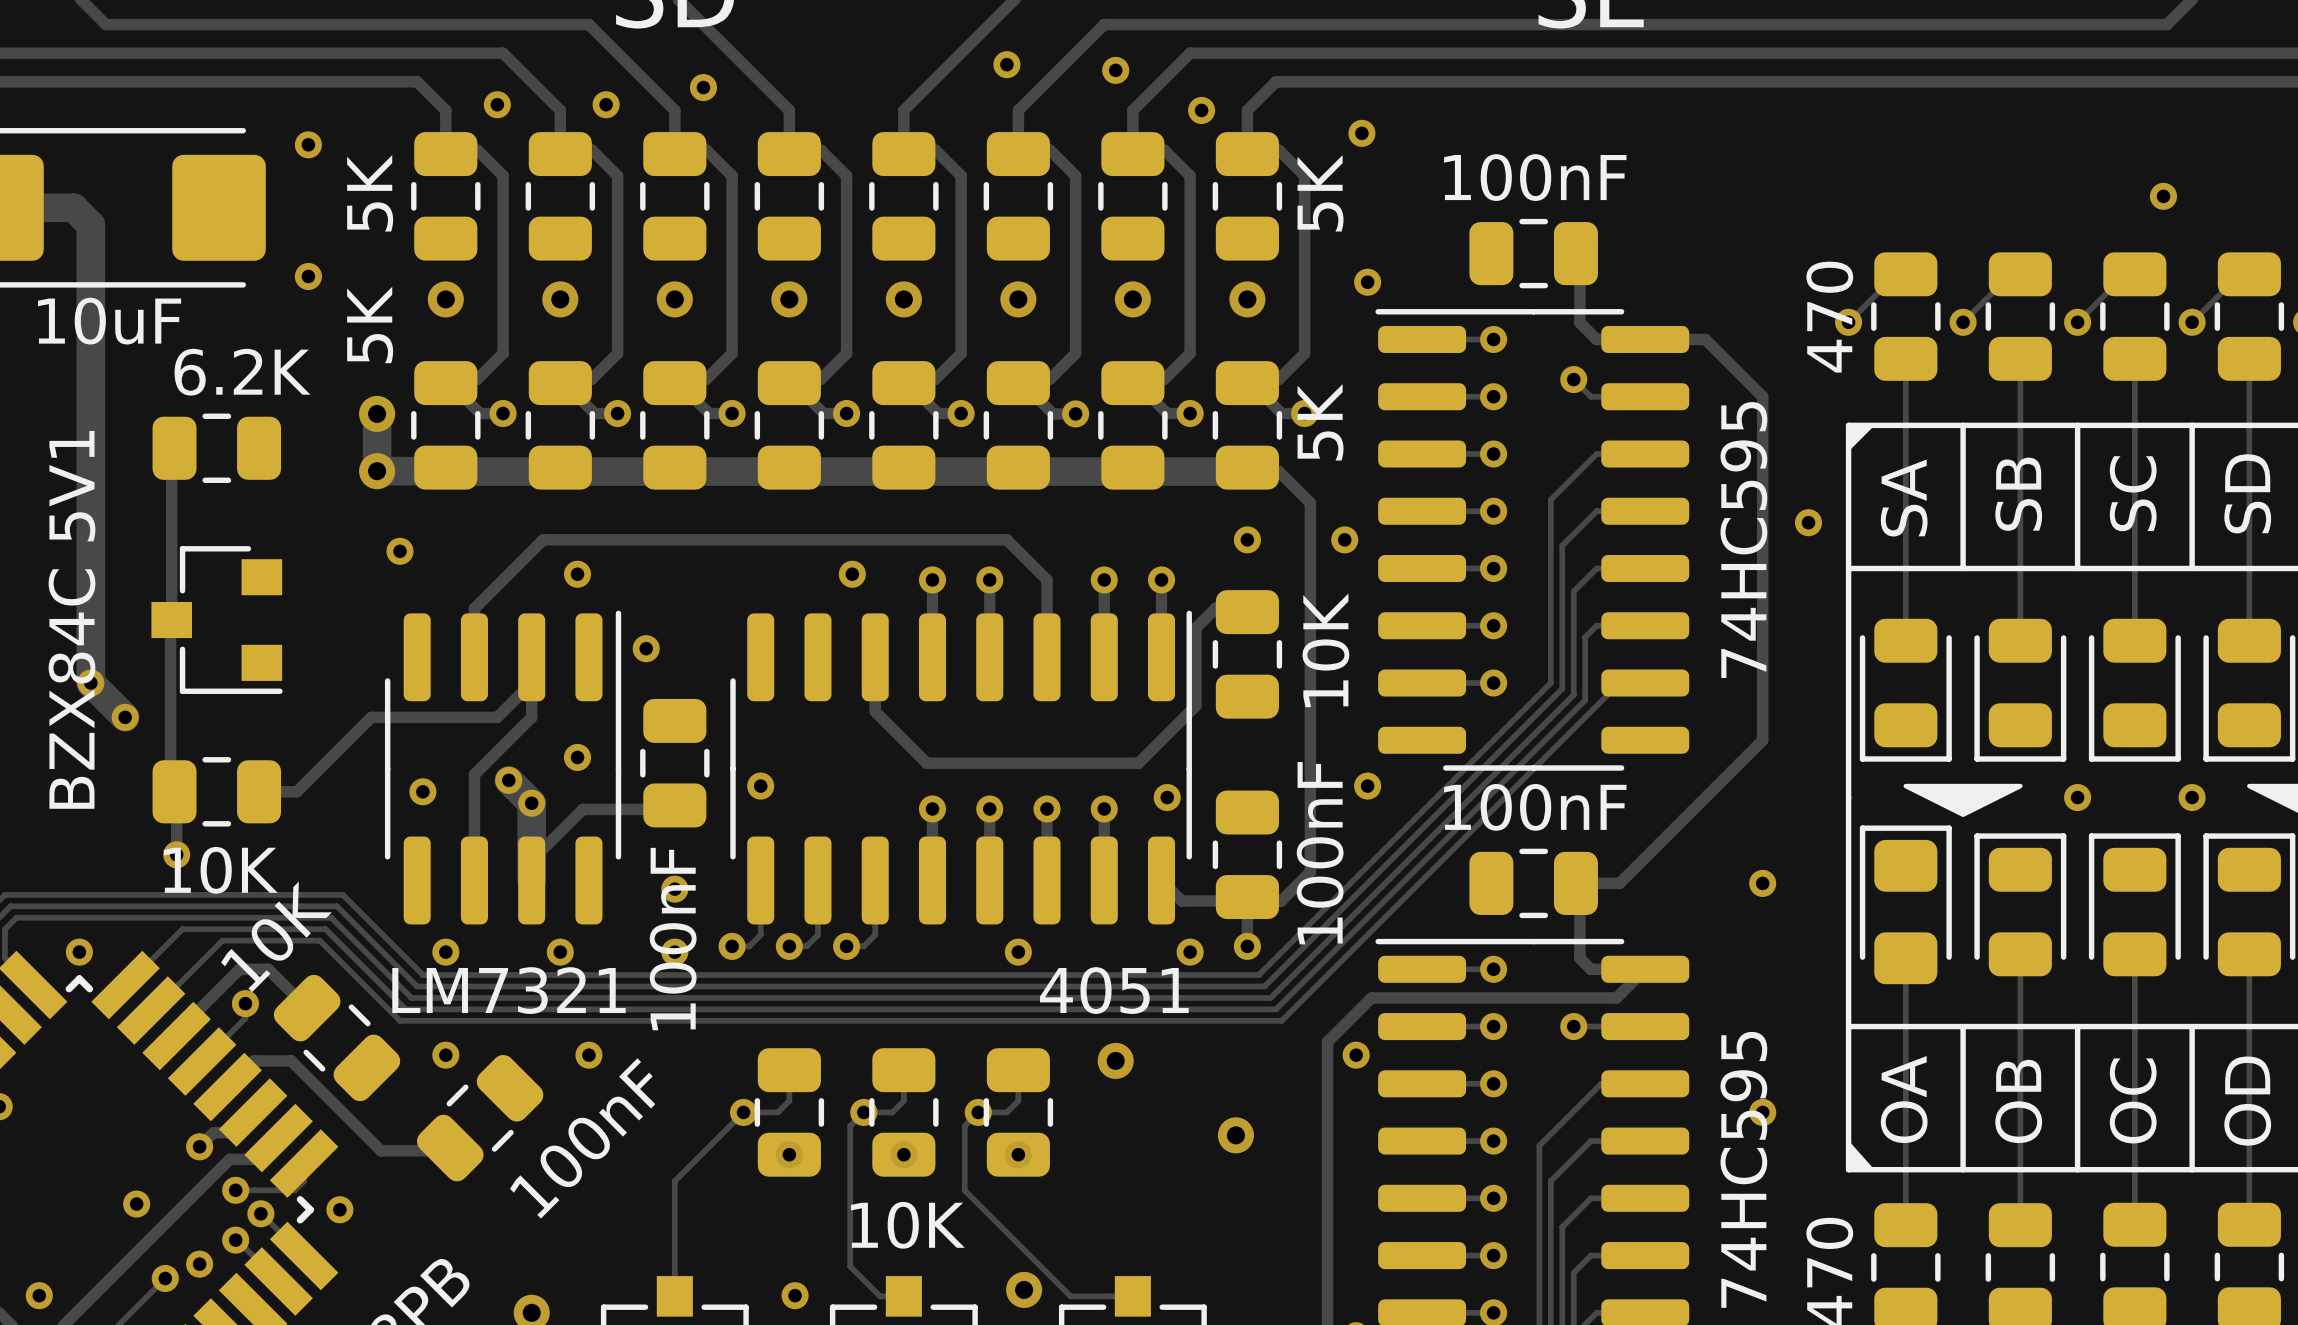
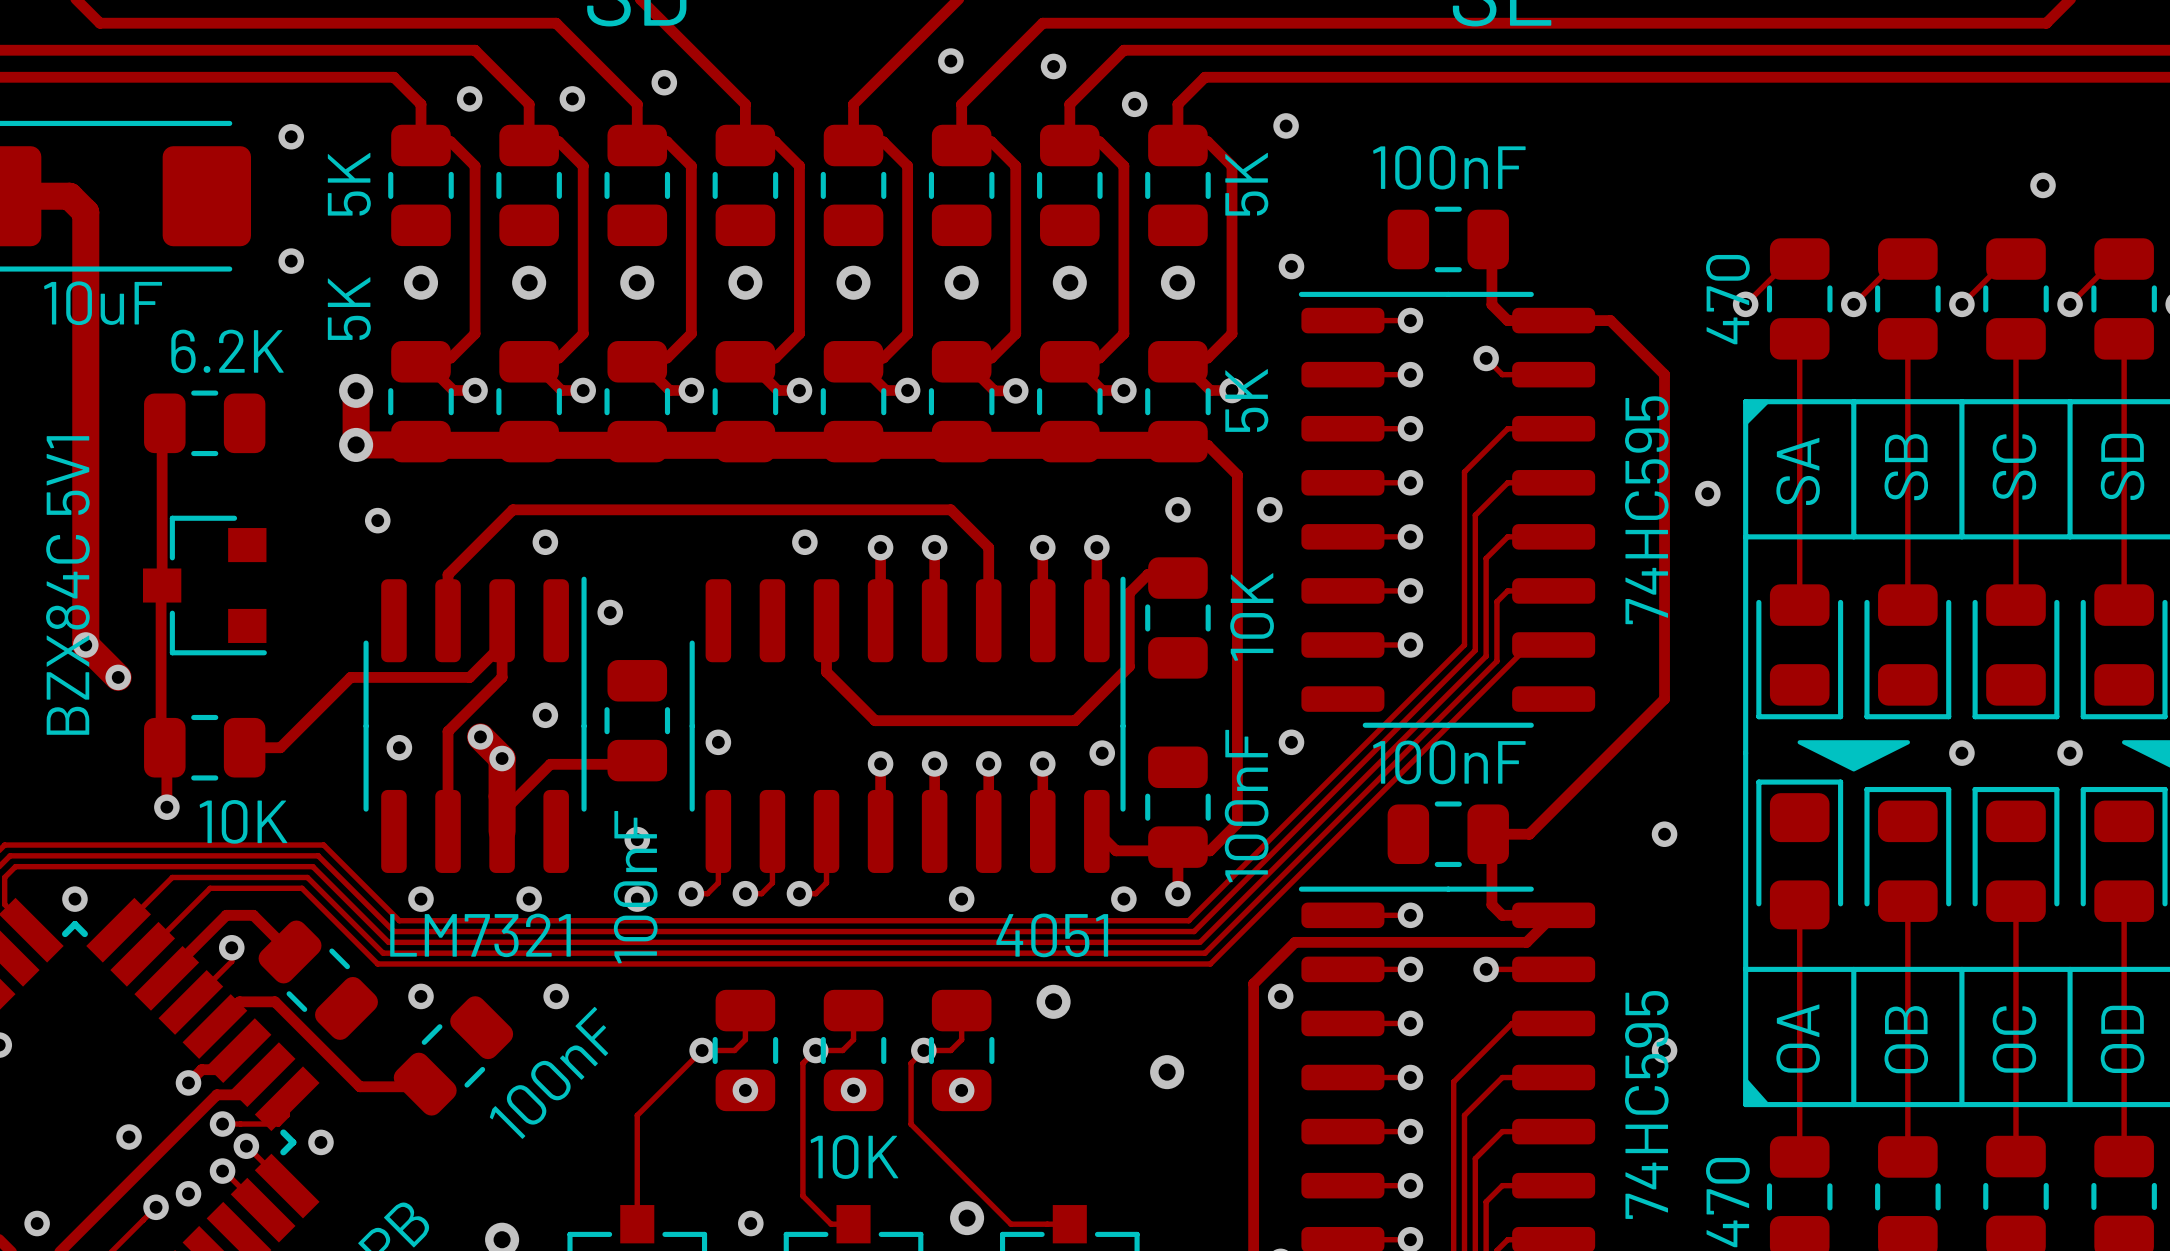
part value position: 10K (220, 870) -> 10K (243, 821)
part value: 10K (276, 936) -> none

